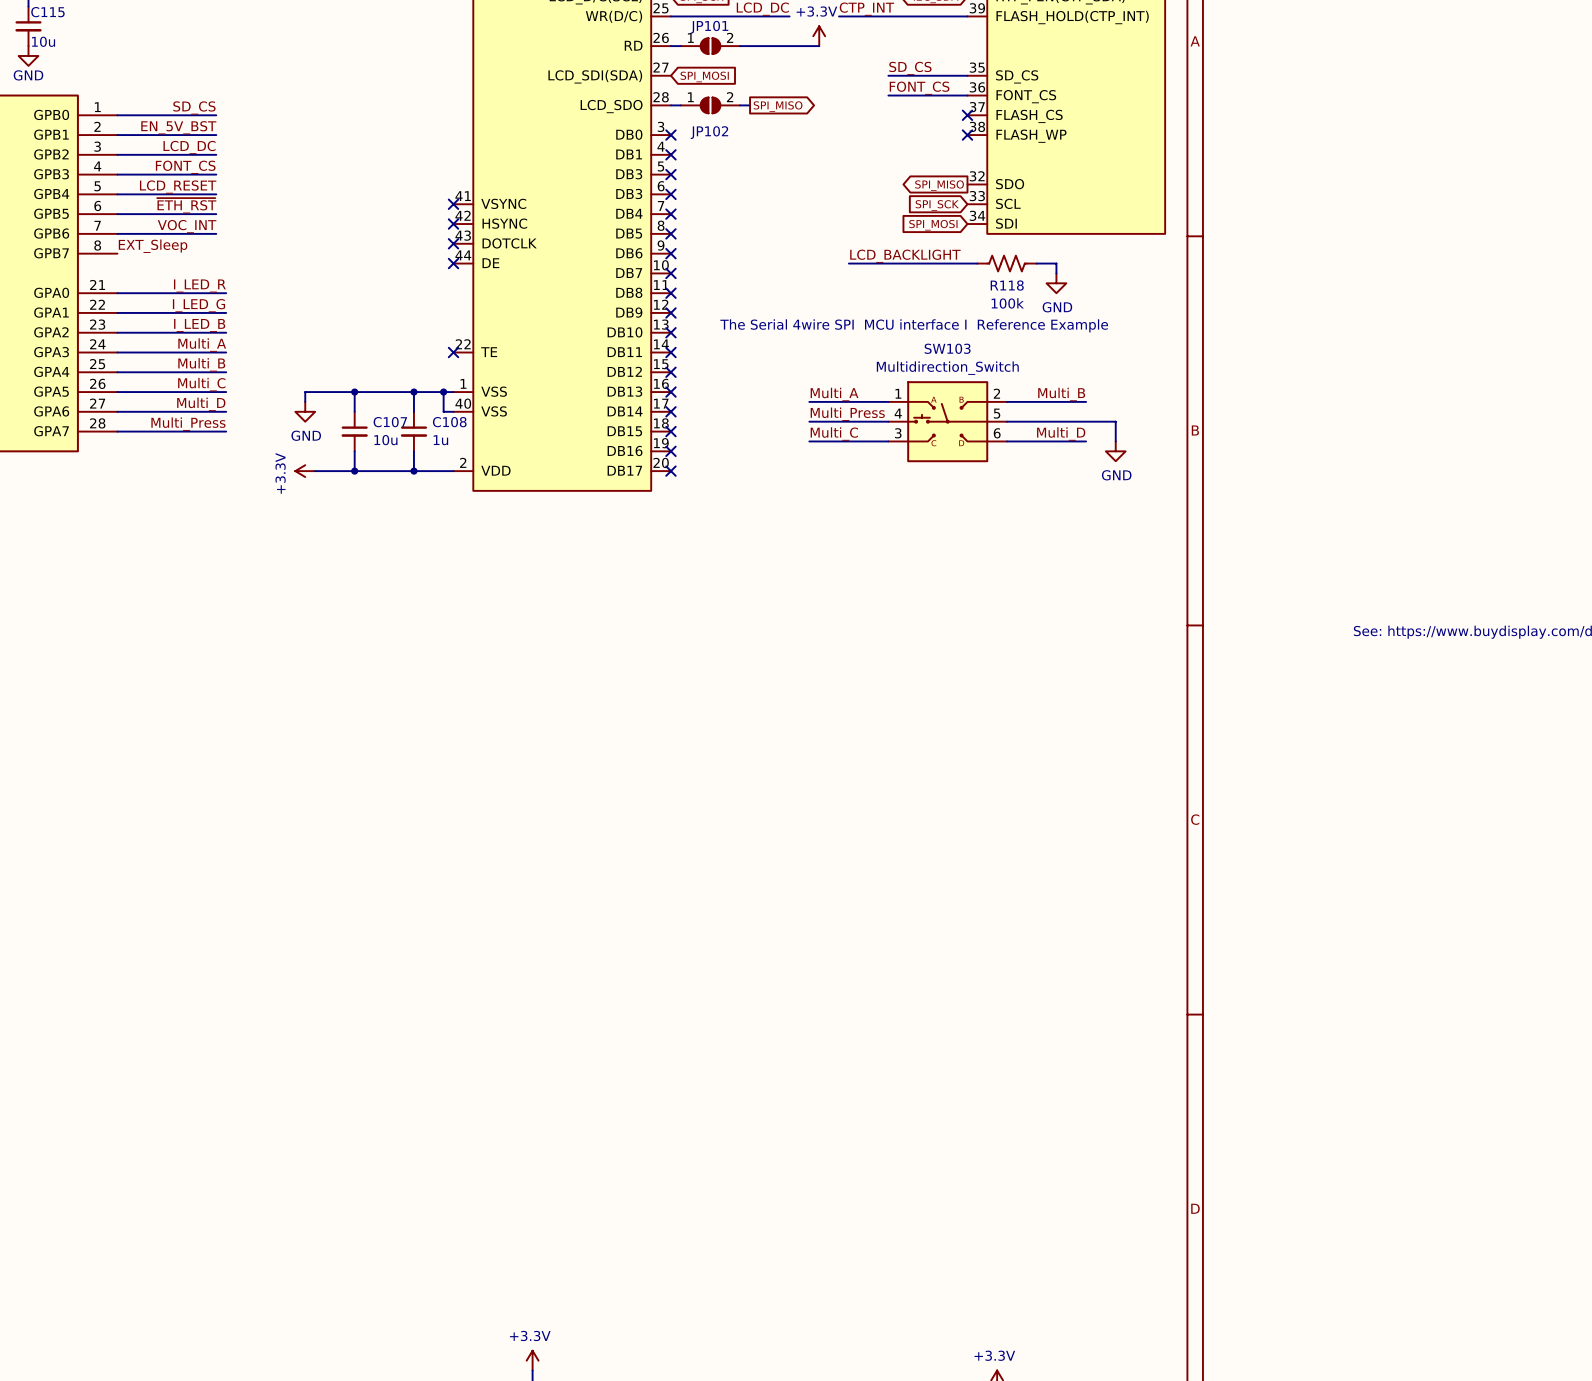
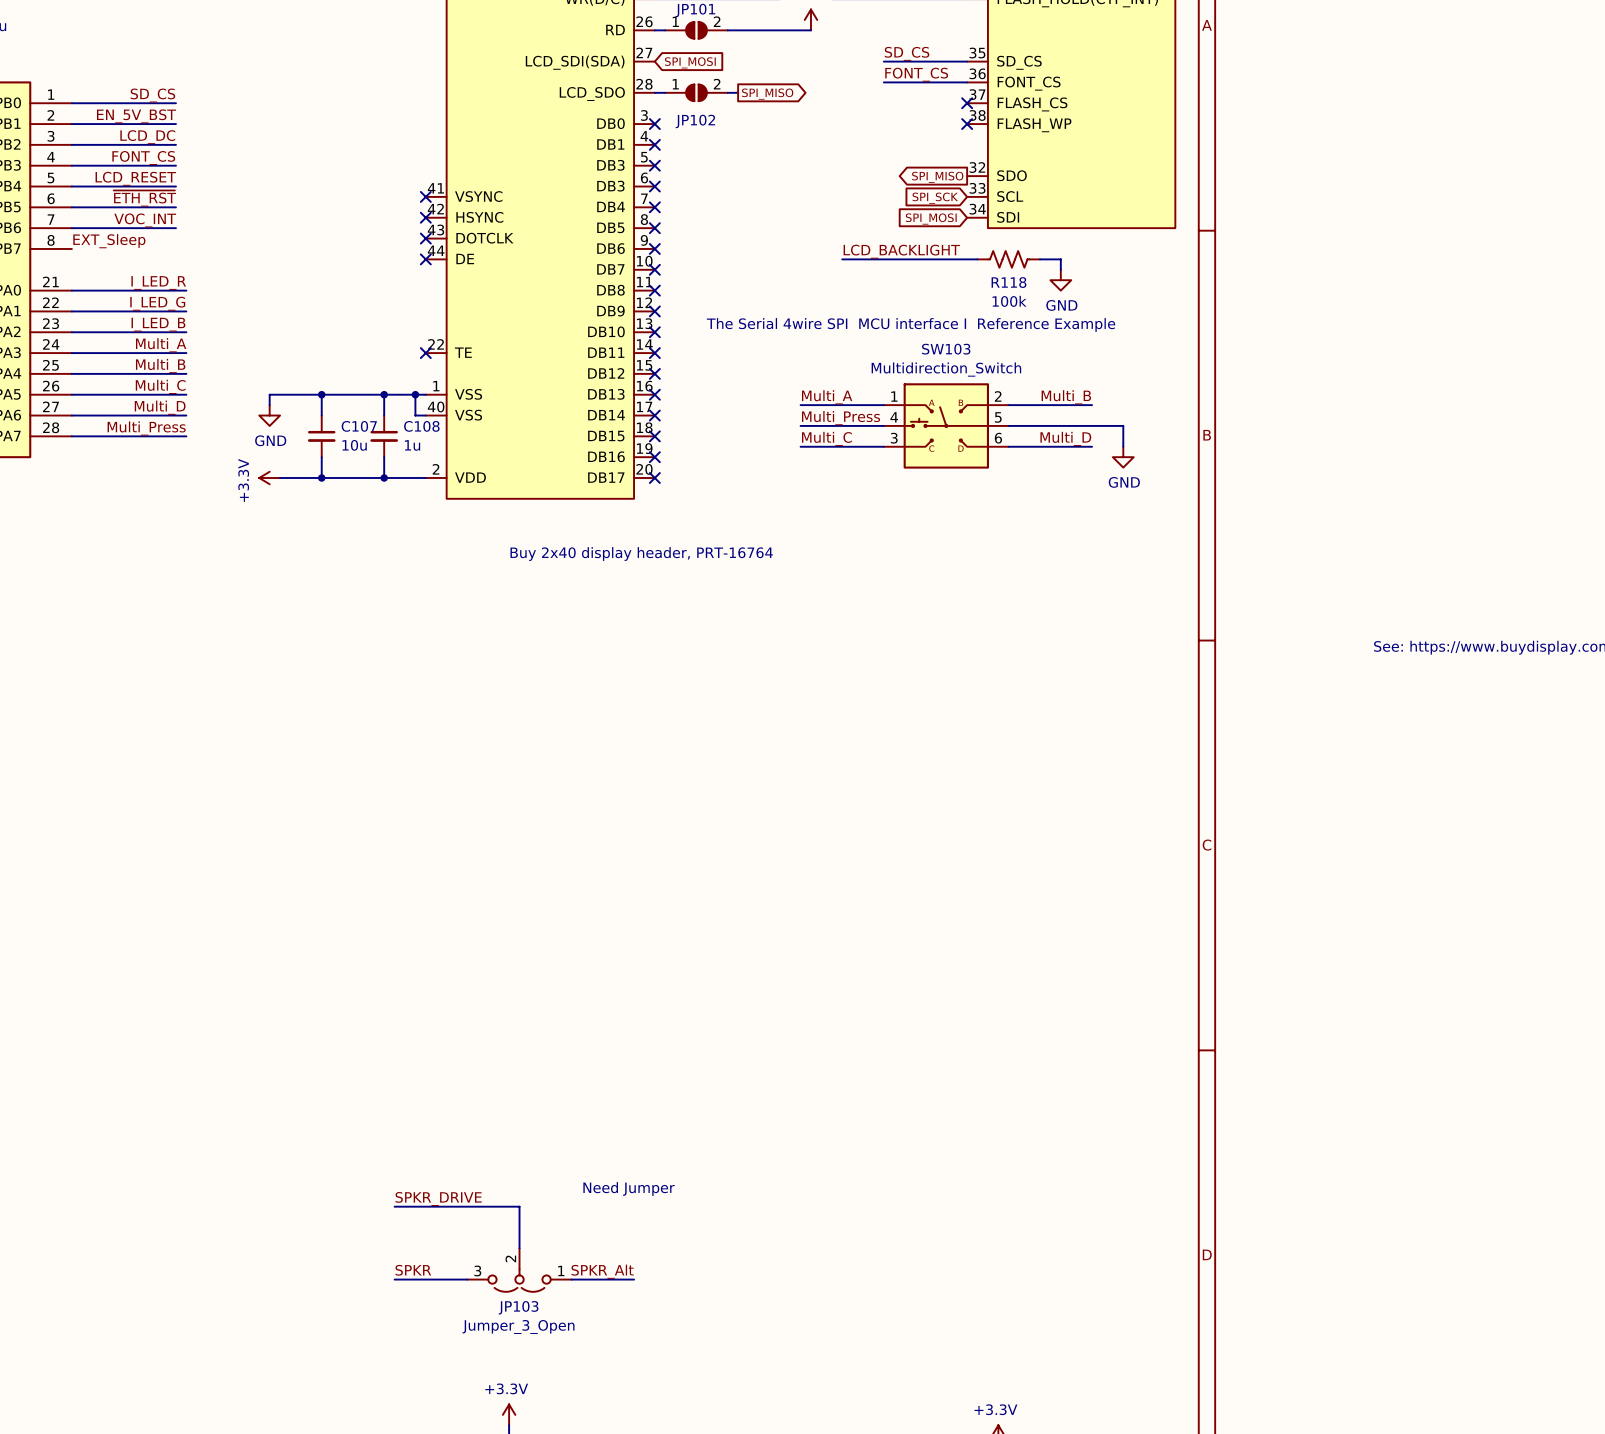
text: none -> Buy 2x40 display header, PRT-16764 (641, 554)
text: none -> Need Jumper (629, 1189)
label: none -> SPKR_DRIVE (438, 1198)
wire: none -> (394, 1206) (519, 1206) (519, 1248)
label: none -> SPKR (413, 1270)
JP103: none -> Jumper_3_Open (519, 1270)
label: none -> SPKR_Alt (602, 1271)
wire: none -> (394, 1279) (467, 1279)
wire: none -> (571, 1279) (634, 1279)

